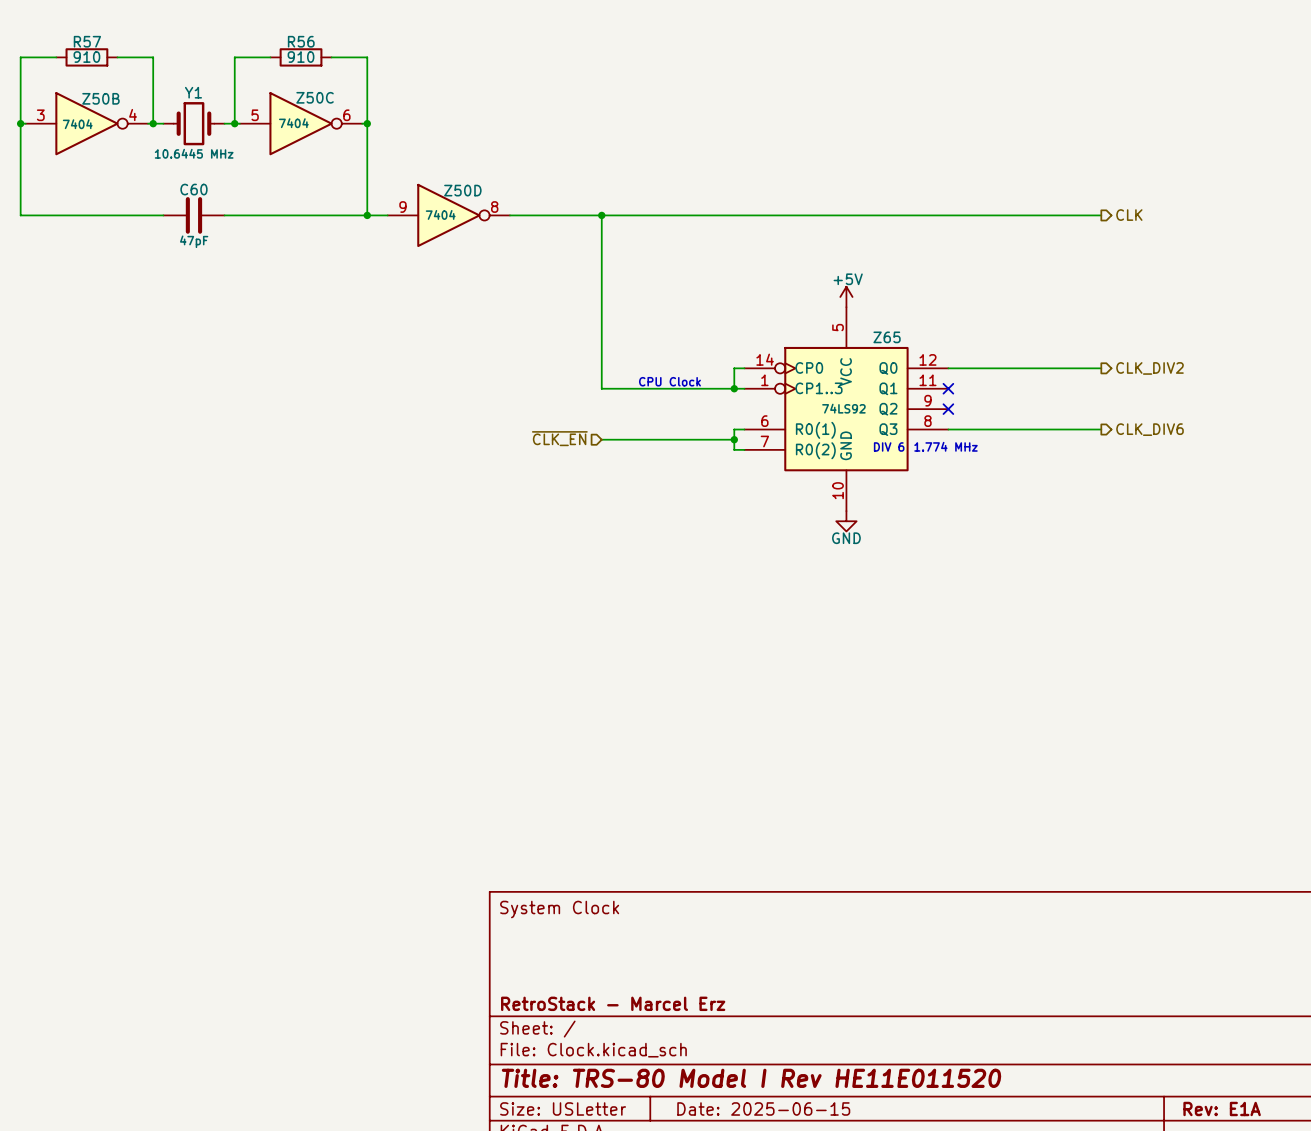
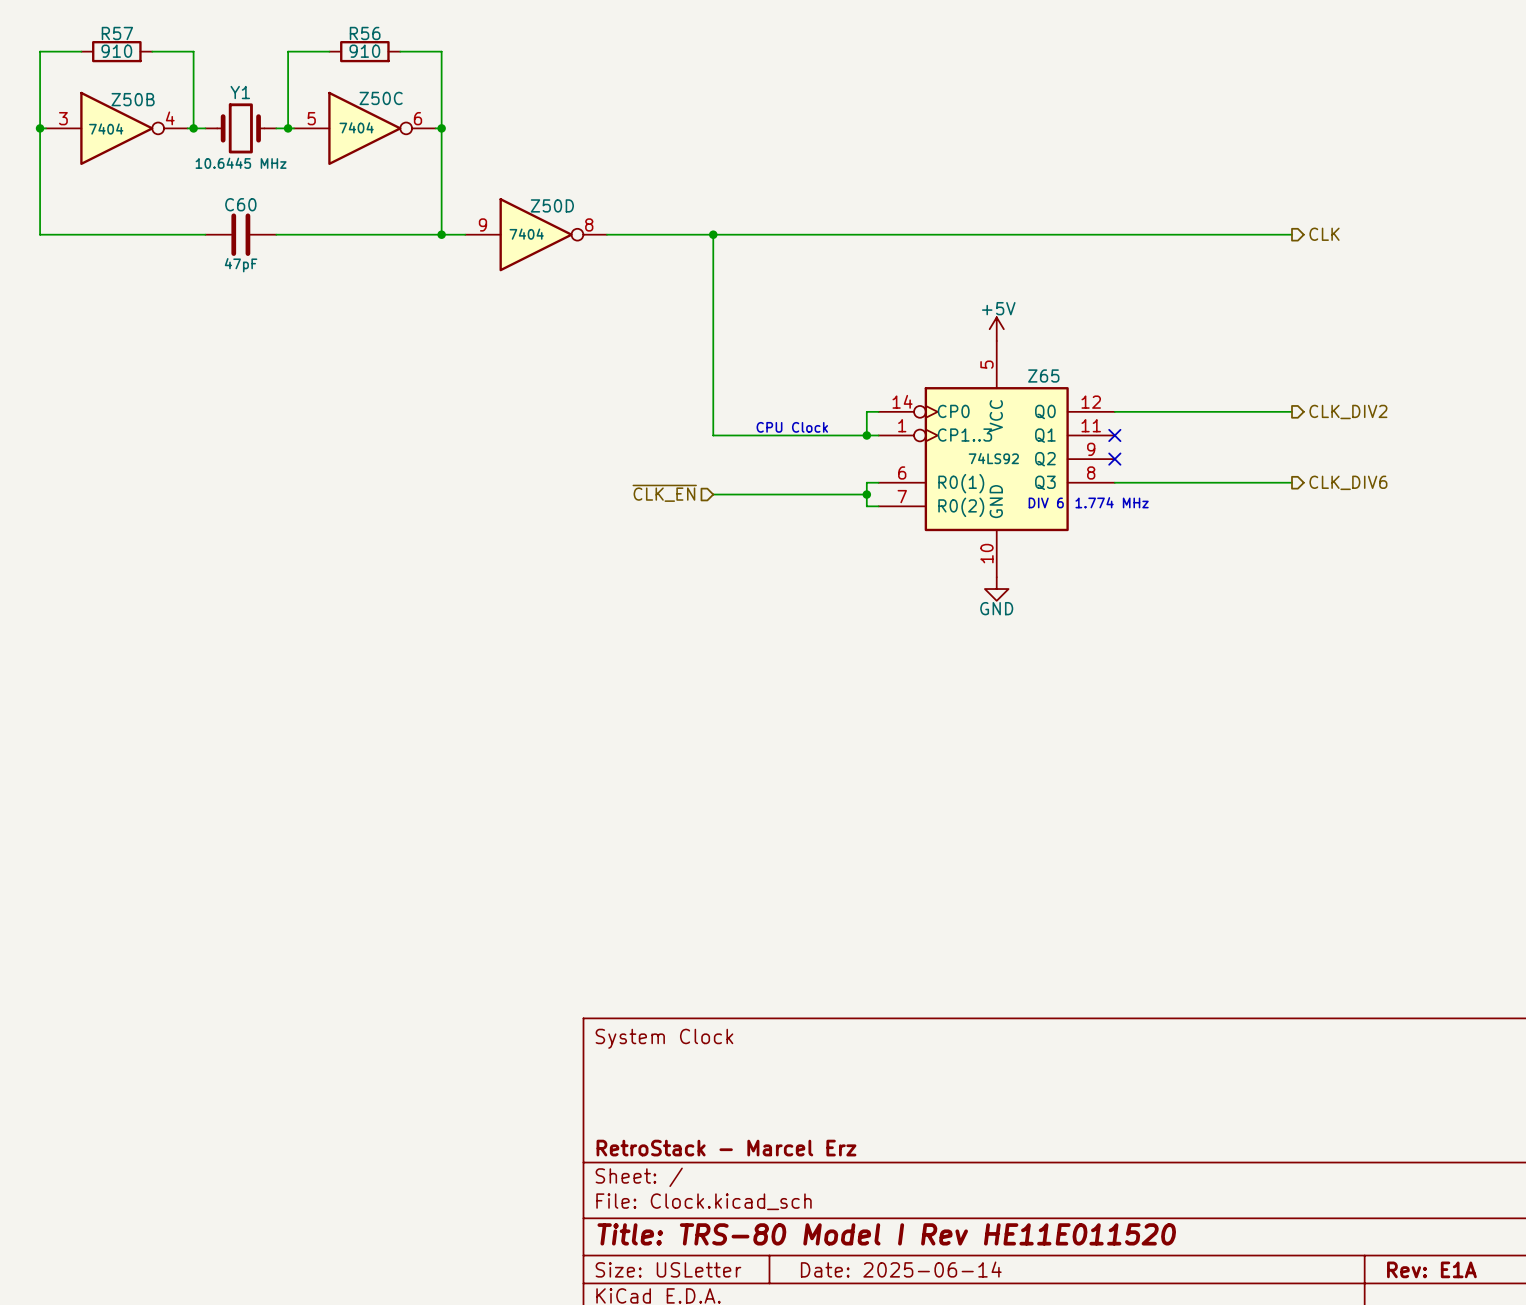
title block: Date: 2025-06-15 (763, 1108) -> Date: 2025-06-14 (901, 1269)

